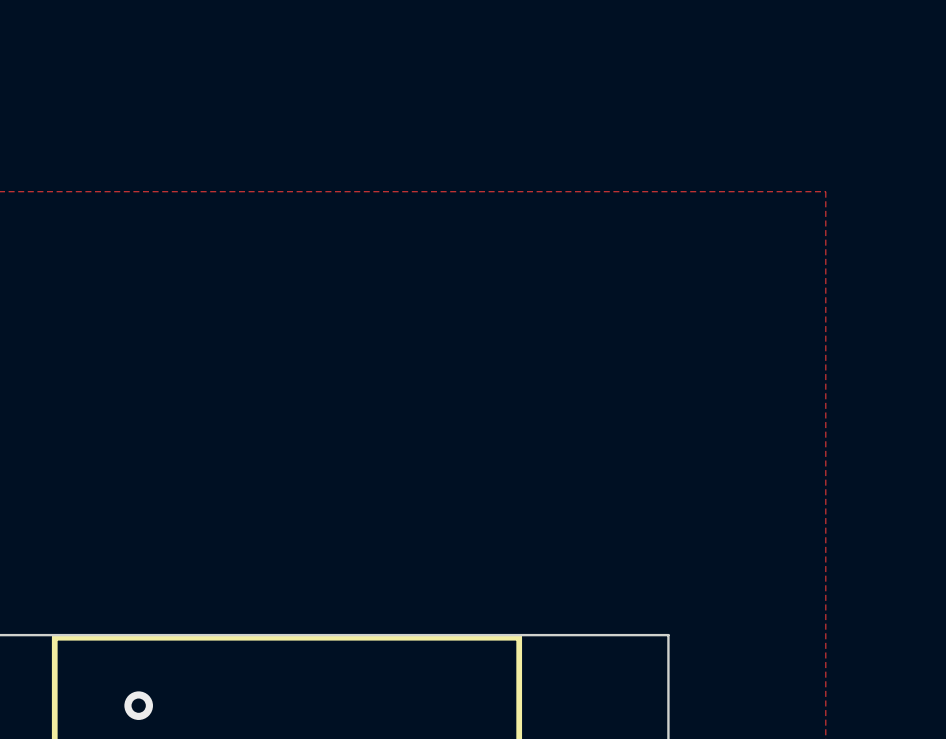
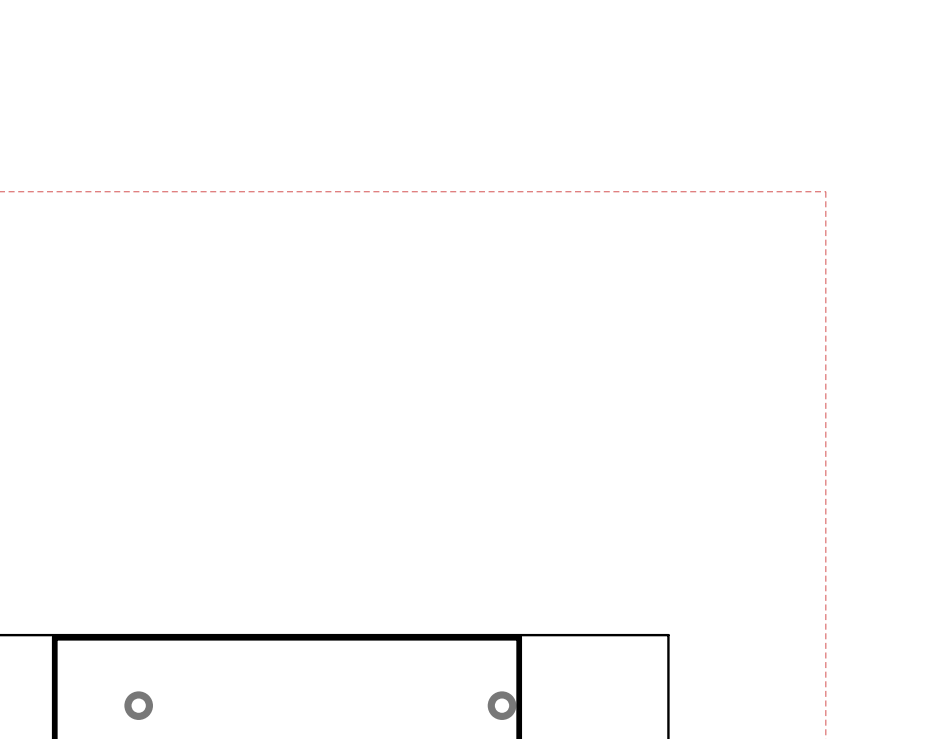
via: none -> (502, 705)

